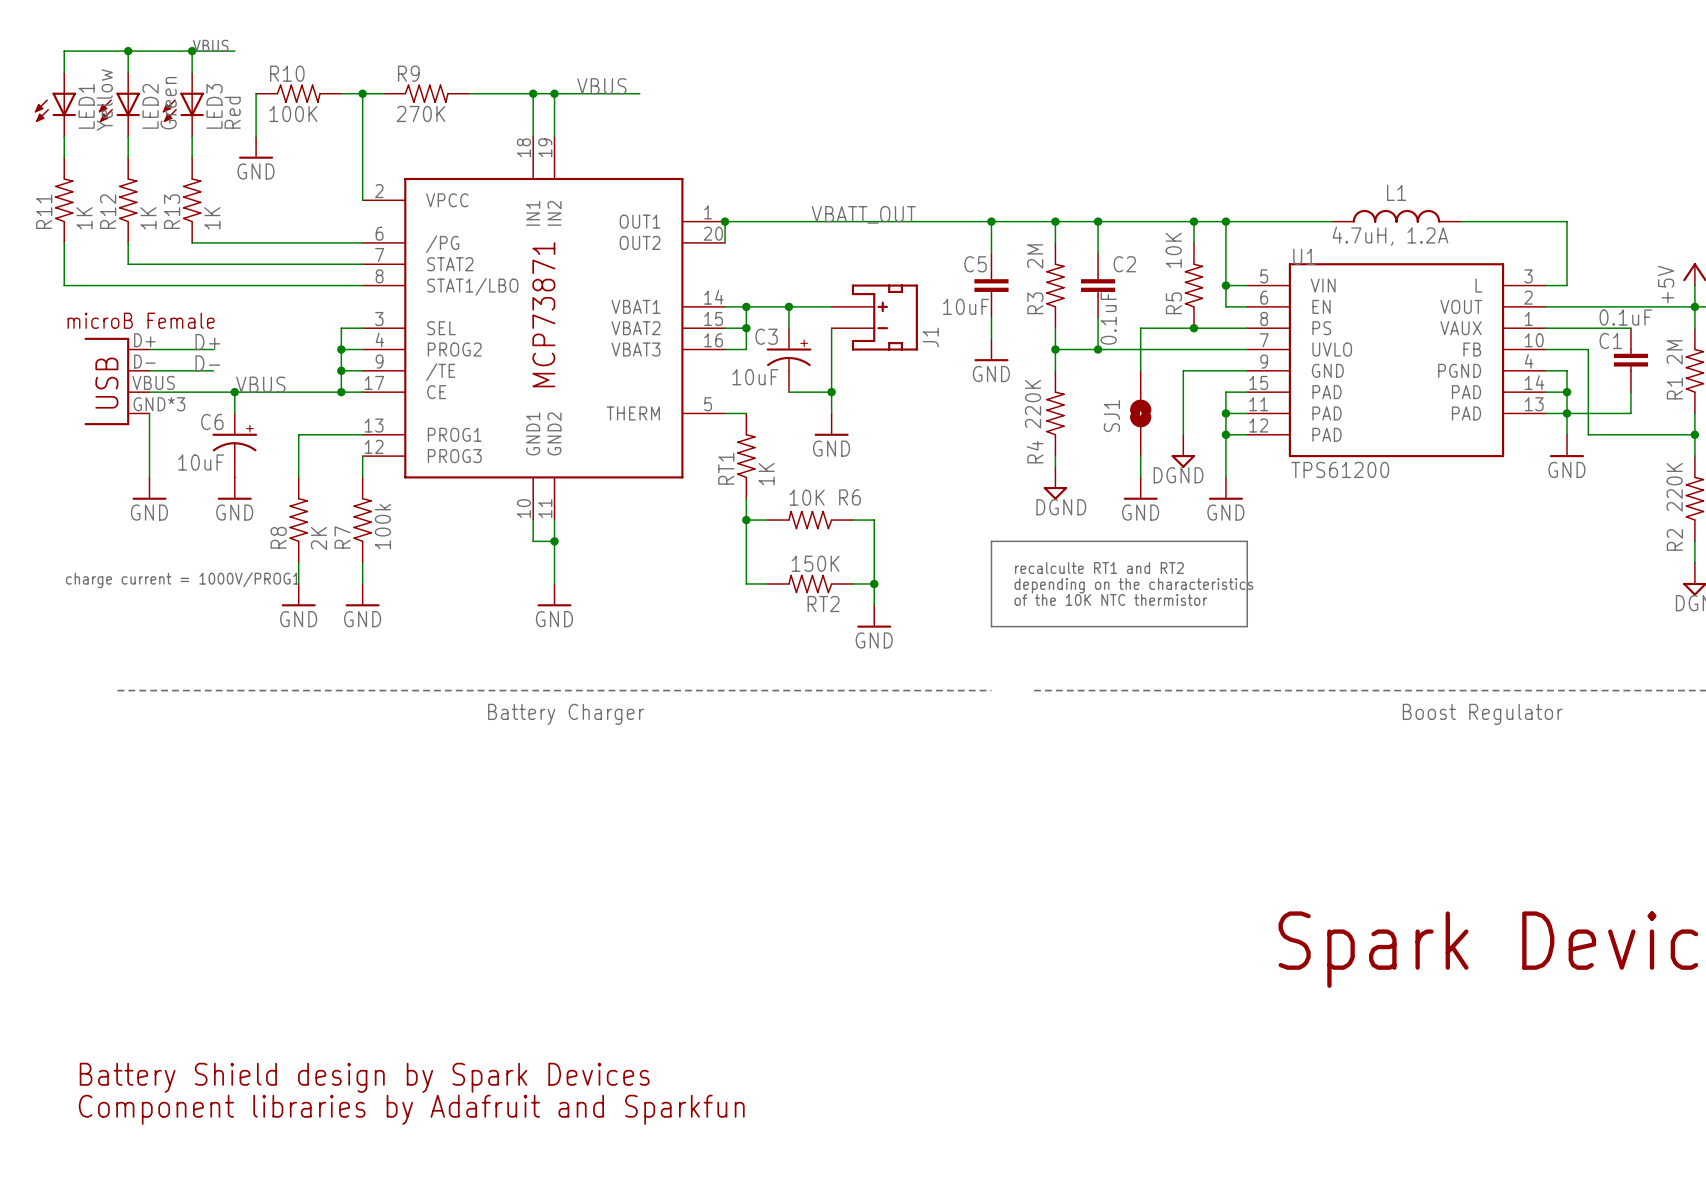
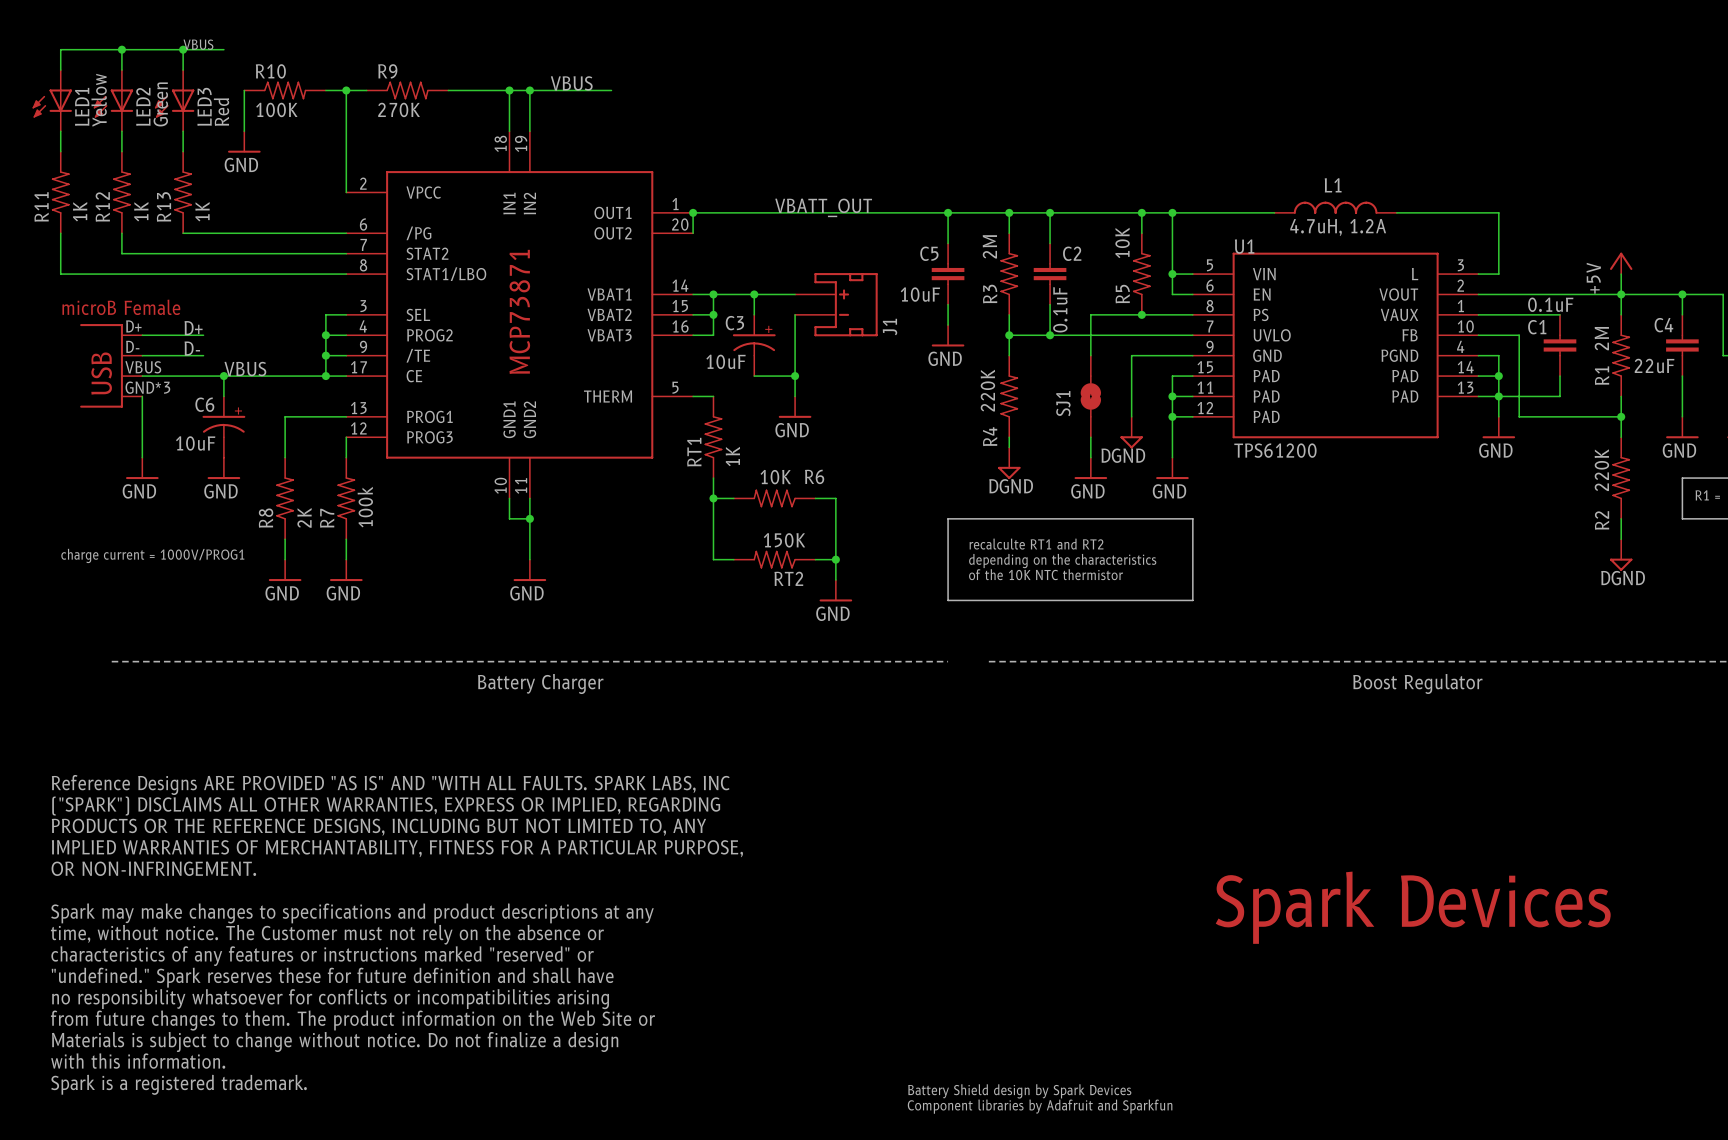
text: none -> Reference Designs ARE PROVIDED "AS IS" AND "WITH ALL FAULTS. SPARK LABS, INC (390, 784)
text: none -> ("SPARK") DISCLAIMS ALL OTHER WARRANTIES, EXPRESS OR IMPLIED, REGARDING (386, 806)
text: none -> PRODUCTS OR THE REFERENCE DESIGNS, INCLUDING BUT NOT LIMITED TO, ANY (378, 827)
text: none -> IMPLIED WARRANTIES OF MERCHANTABILITY, FITNESS FOR A PARTICULAR PURPOSE, (397, 848)
text: none -> OR NON-INFRINGEMENT. (153, 868)
text: none -> Spark may make changes to specifications and product descriptions at any (352, 913)
text: none -> time, without notice. The Customer must not rely on the absence or (327, 934)
text: none -> characteristics of any features or instructions marked "reserved" or (322, 956)
text: none -> "undefined." Spark reserves these for future definition and shall have (332, 977)
text: none -> no responsibility whatsoever for conflicts or incompatibilities arising (330, 999)
text: none -> from future changes to them. The product information on the Web Site or (353, 1020)
text: Battery Shield design by Spark Devices (364, 1077) -> none
text: none -> Materials is subject to change without notice. Do not finalize a design (335, 1041)
text: none -> with this information. (138, 1061)
text: Component libraries by Adafruit and Sparkfun (411, 1109) -> none
text: none -> Spark is a registered trademark. (179, 1084)
text: none -> Battery Shield design by Spark Devices (1019, 1091)
text: none -> Component libraries by Adafruit and Sparkfun (1040, 1106)

